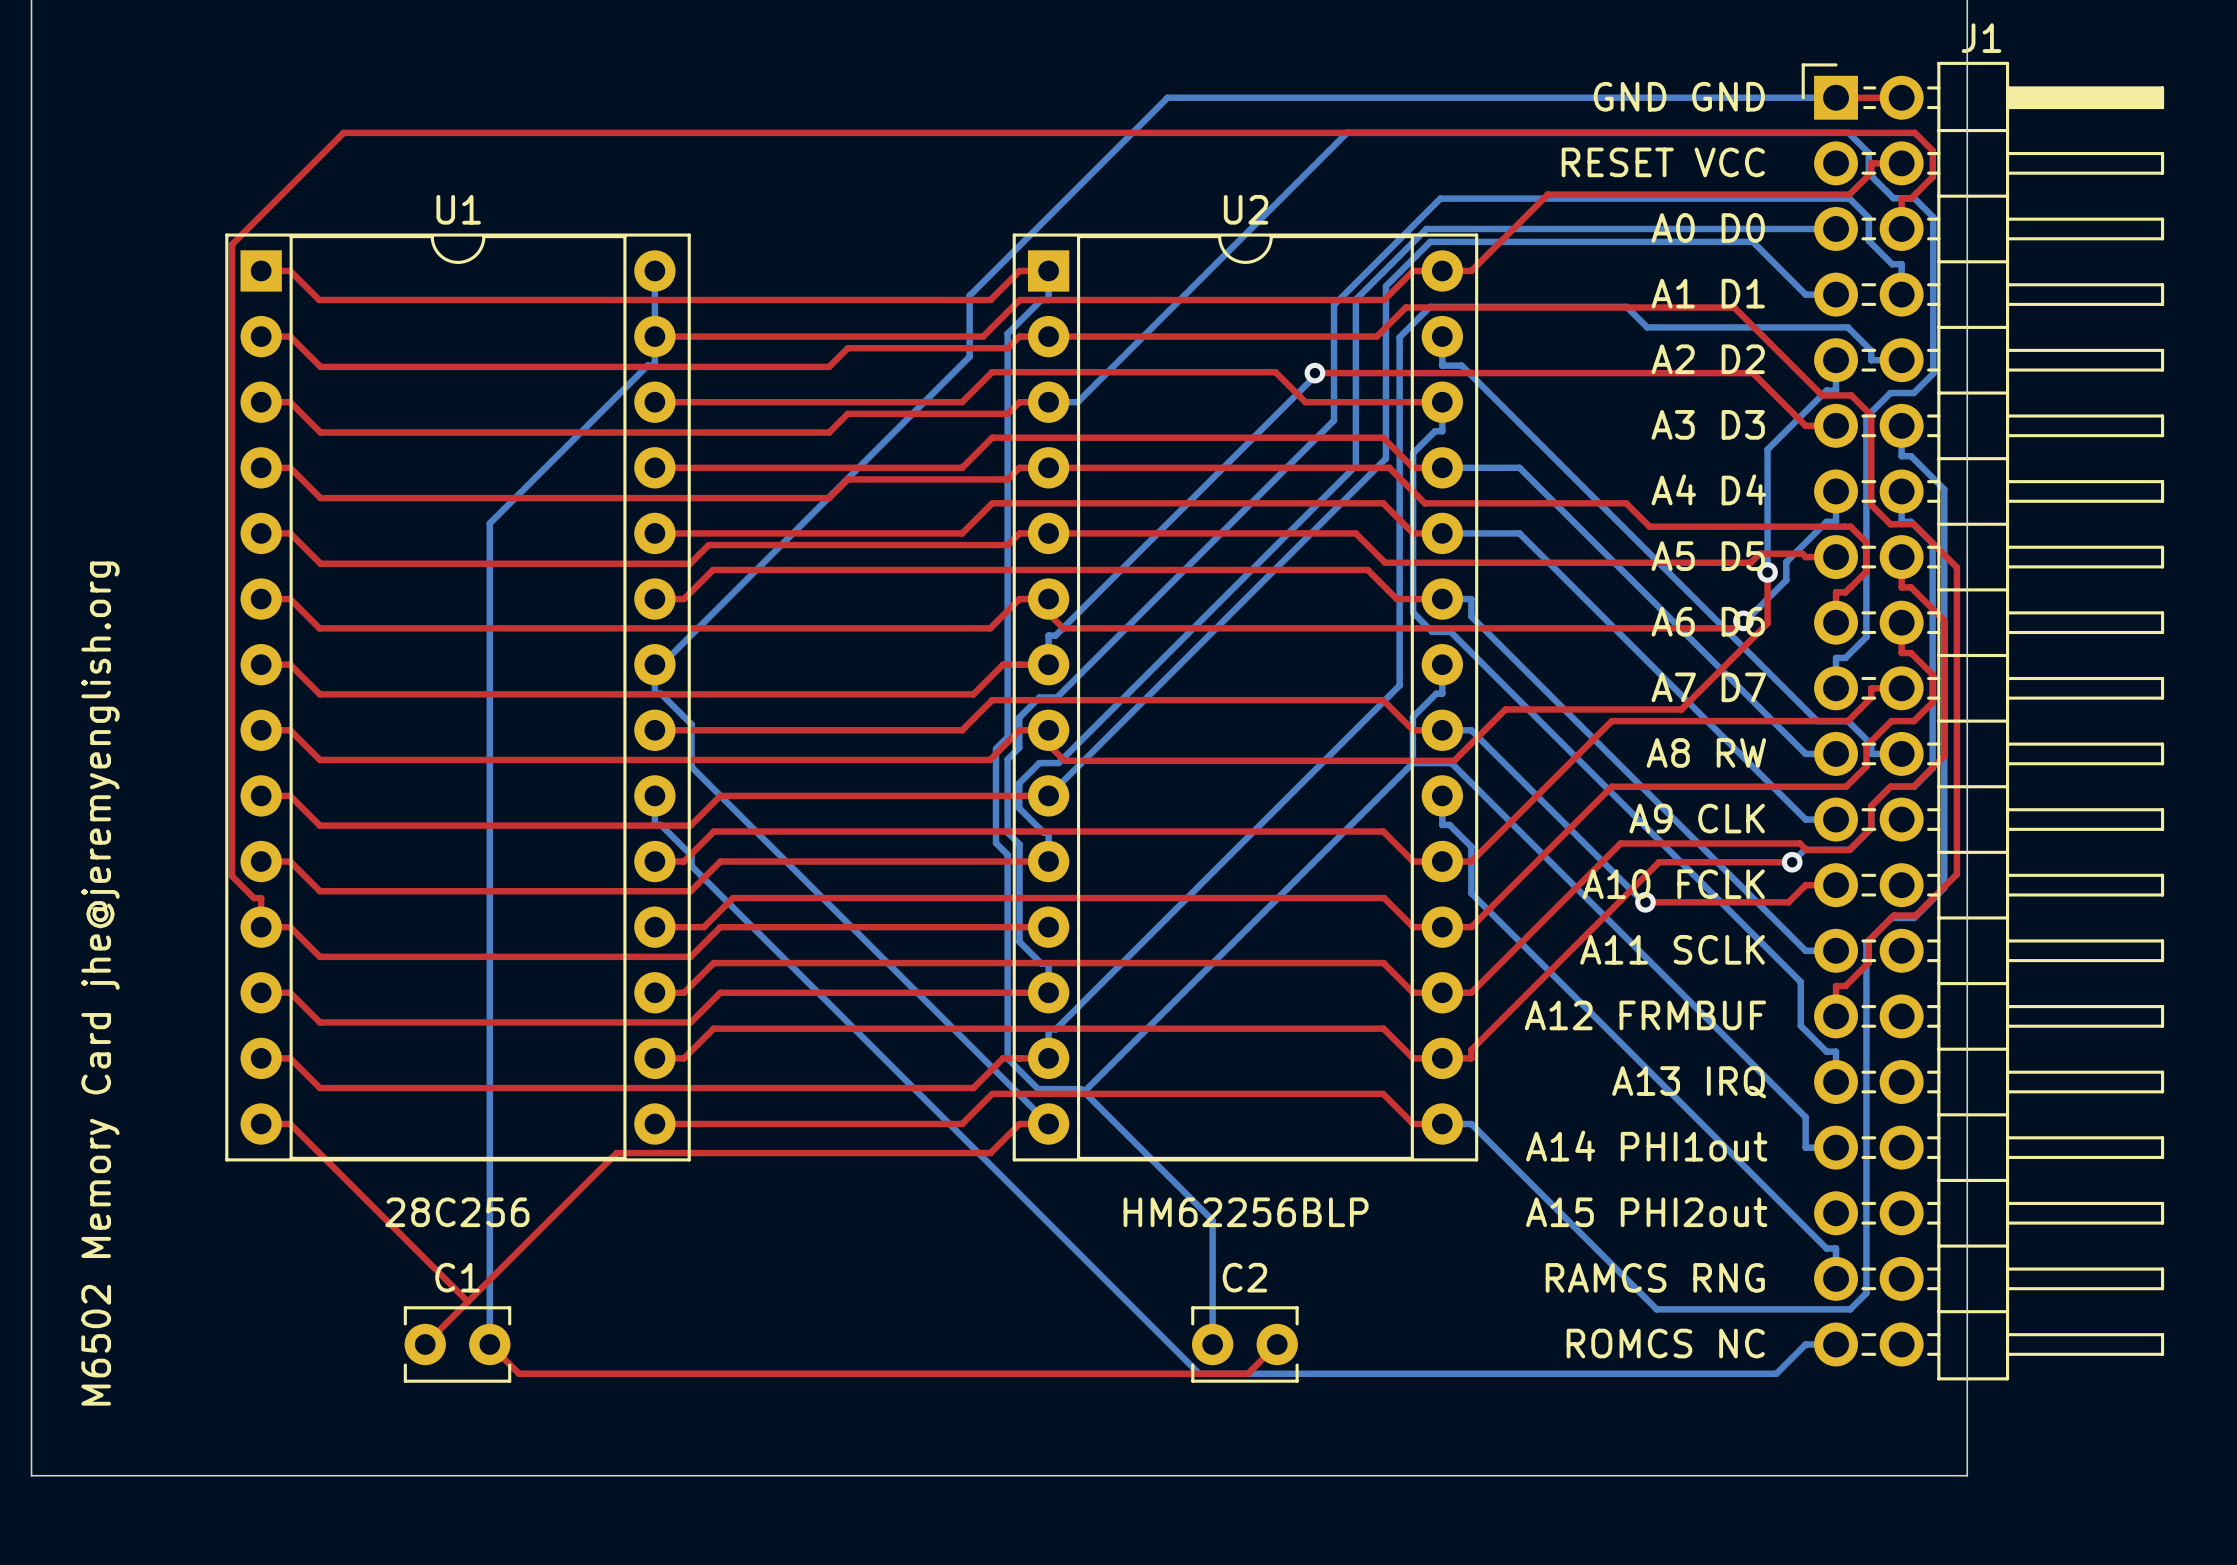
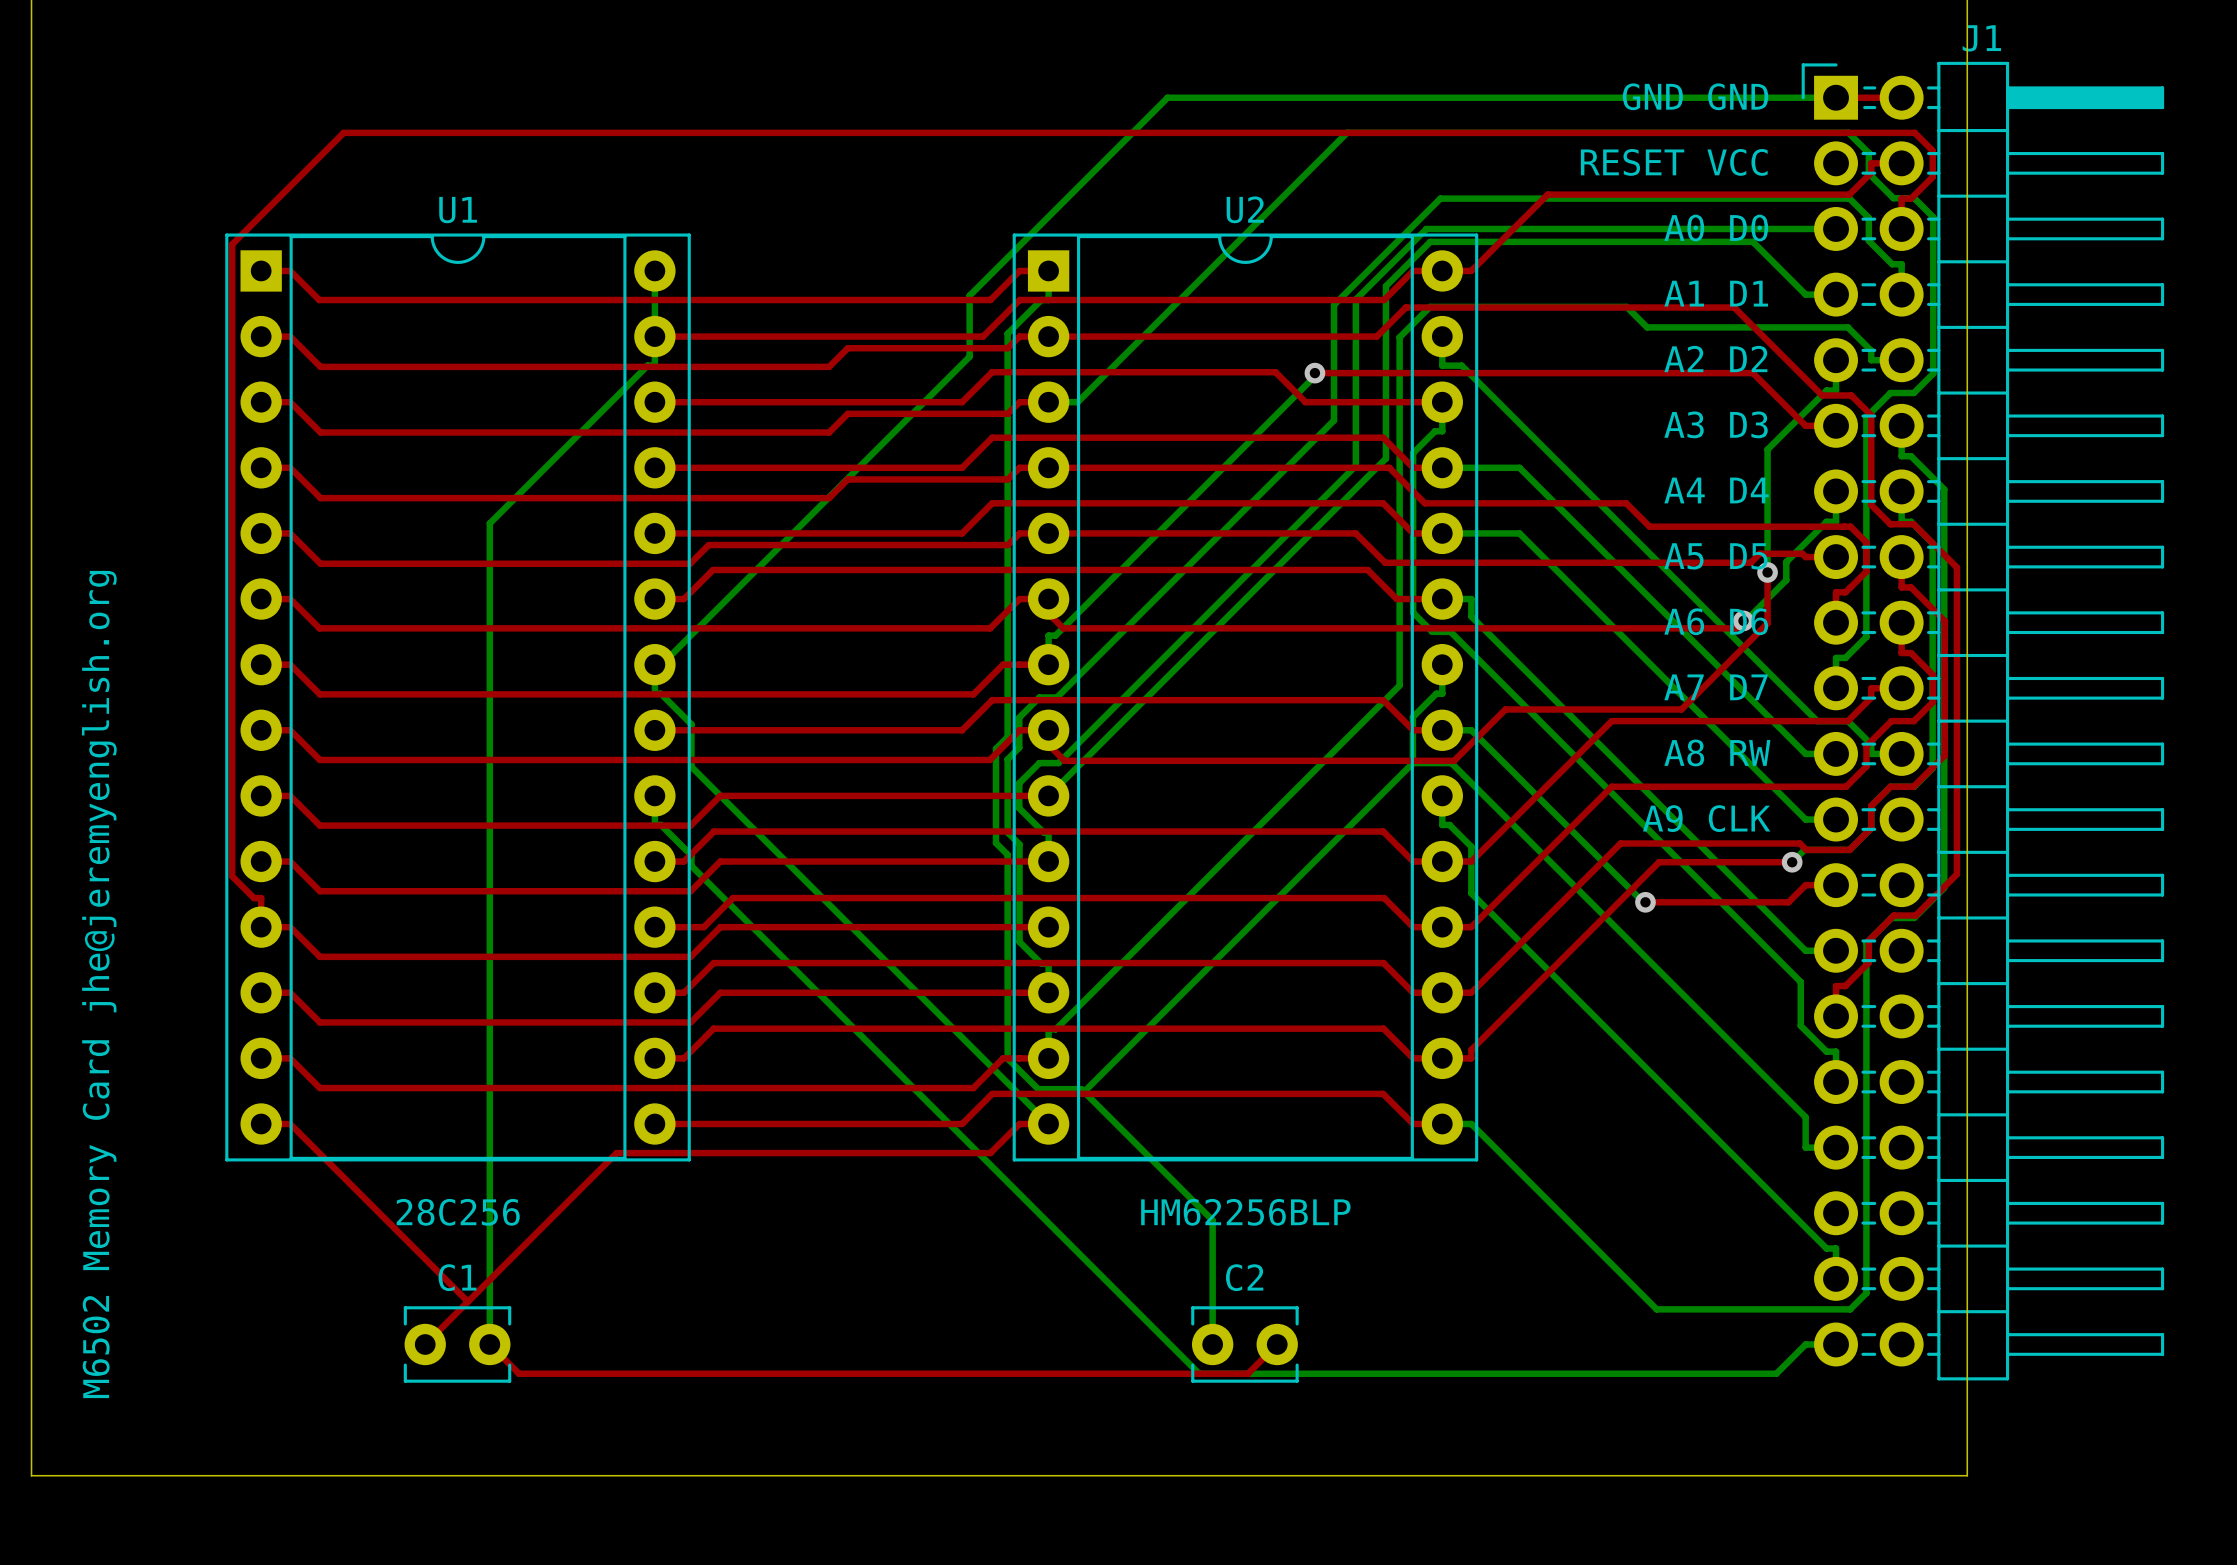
text: A10 FCLK (1673, 884) -> none
text: A11 SCLK (1672, 949) -> none
text: A12 FRMBUF (1645, 1015) -> none
text: A13 IRQ (1689, 1082) -> none
text: A14 PHI1out (1646, 1146) -> none
text: A15 PHI2out (1646, 1212) -> none
text: RAMCS RNG (1655, 1277) -> none
text: ROMCS NC (1665, 1343) -> none

